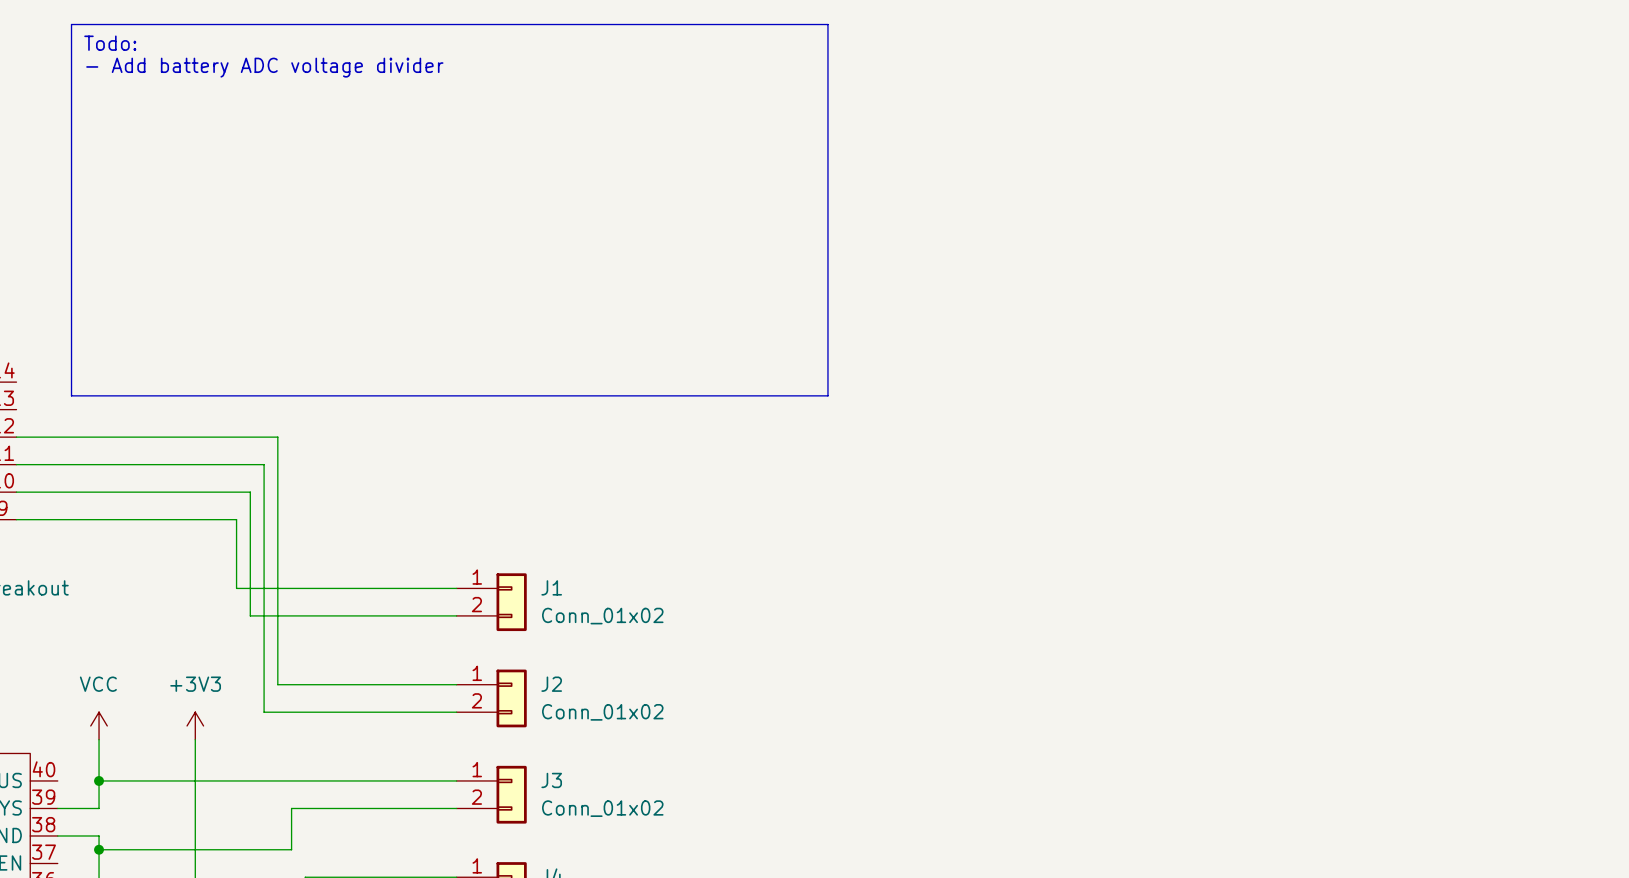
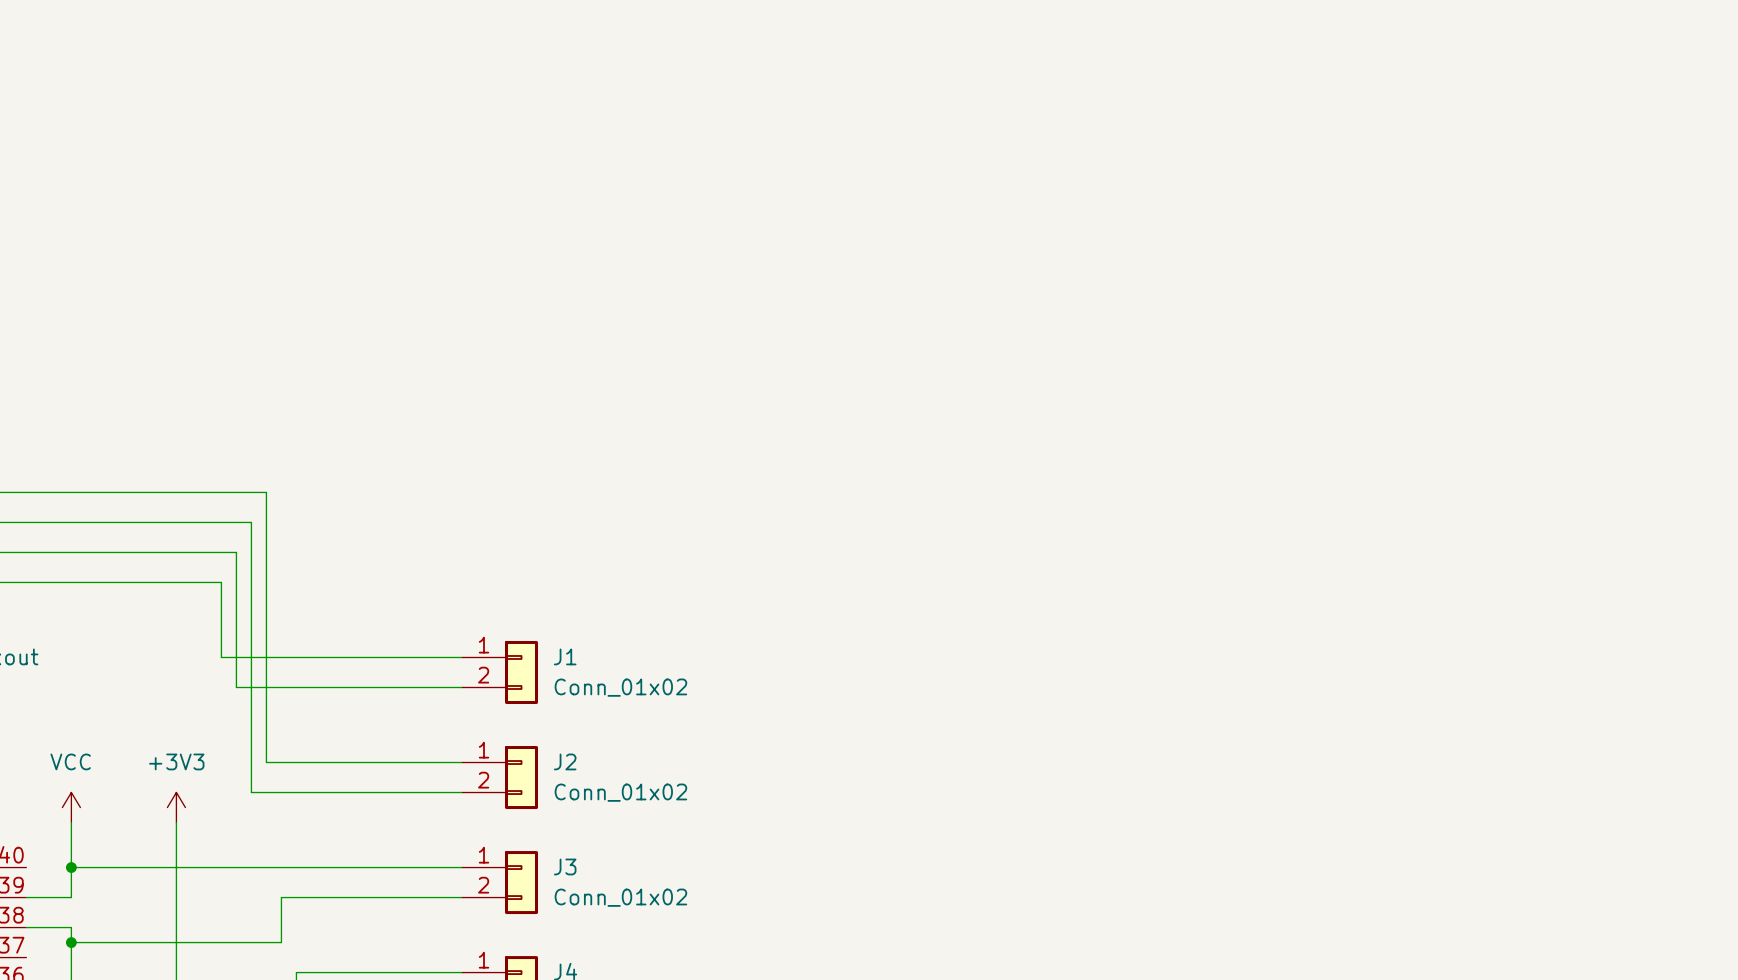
line: (71, 24) (827, 24) (827, 395) (71, 395) (71, 24) -> none
text: Todo: (110, 43) -> none
text: - Add battery ADC voltage divider (264, 67) -> none

